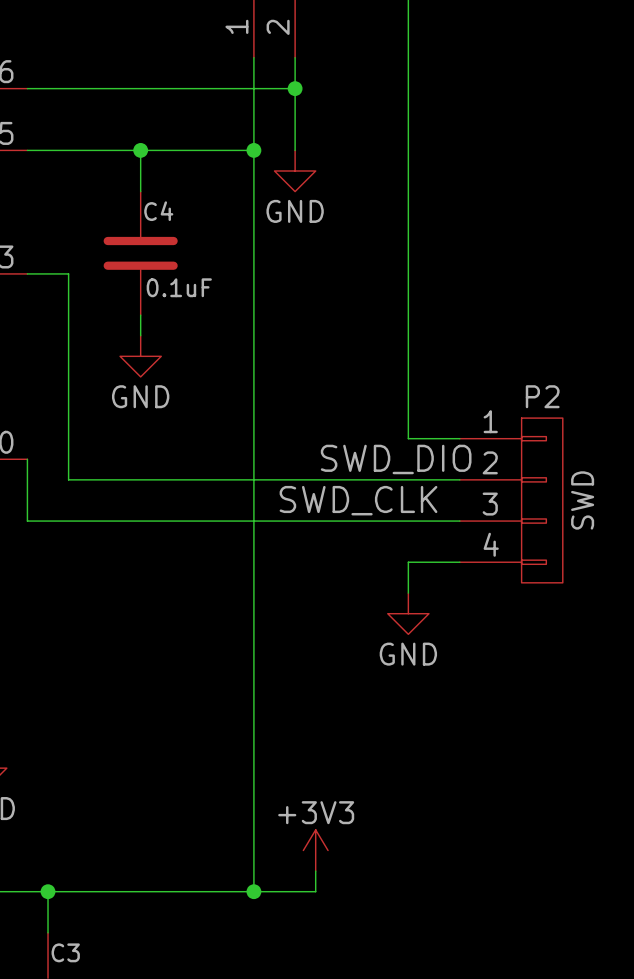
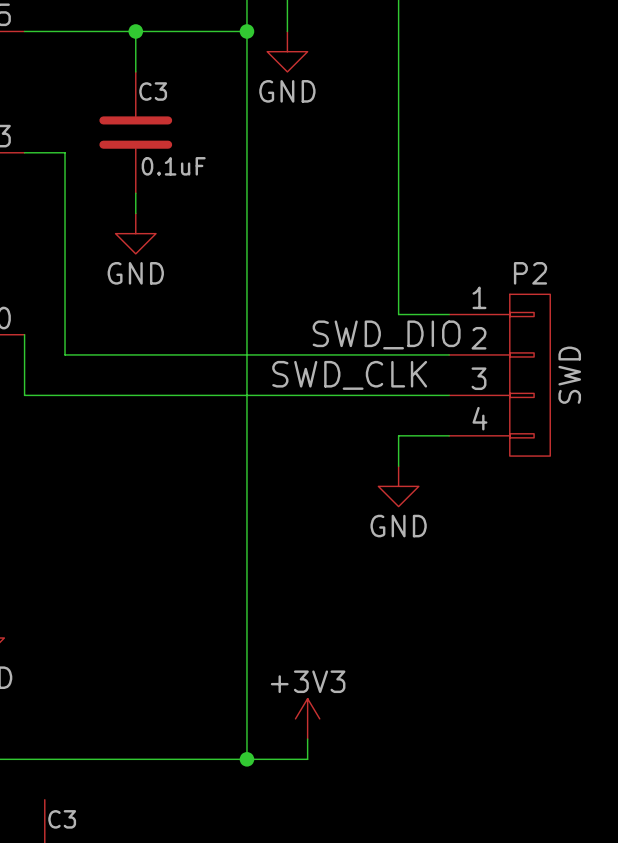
C4 name: C4 (158, 211) -> C3 (153, 91)
wire: (48, 891) (48, 932) -> none
junction: (48, 891) -> none

